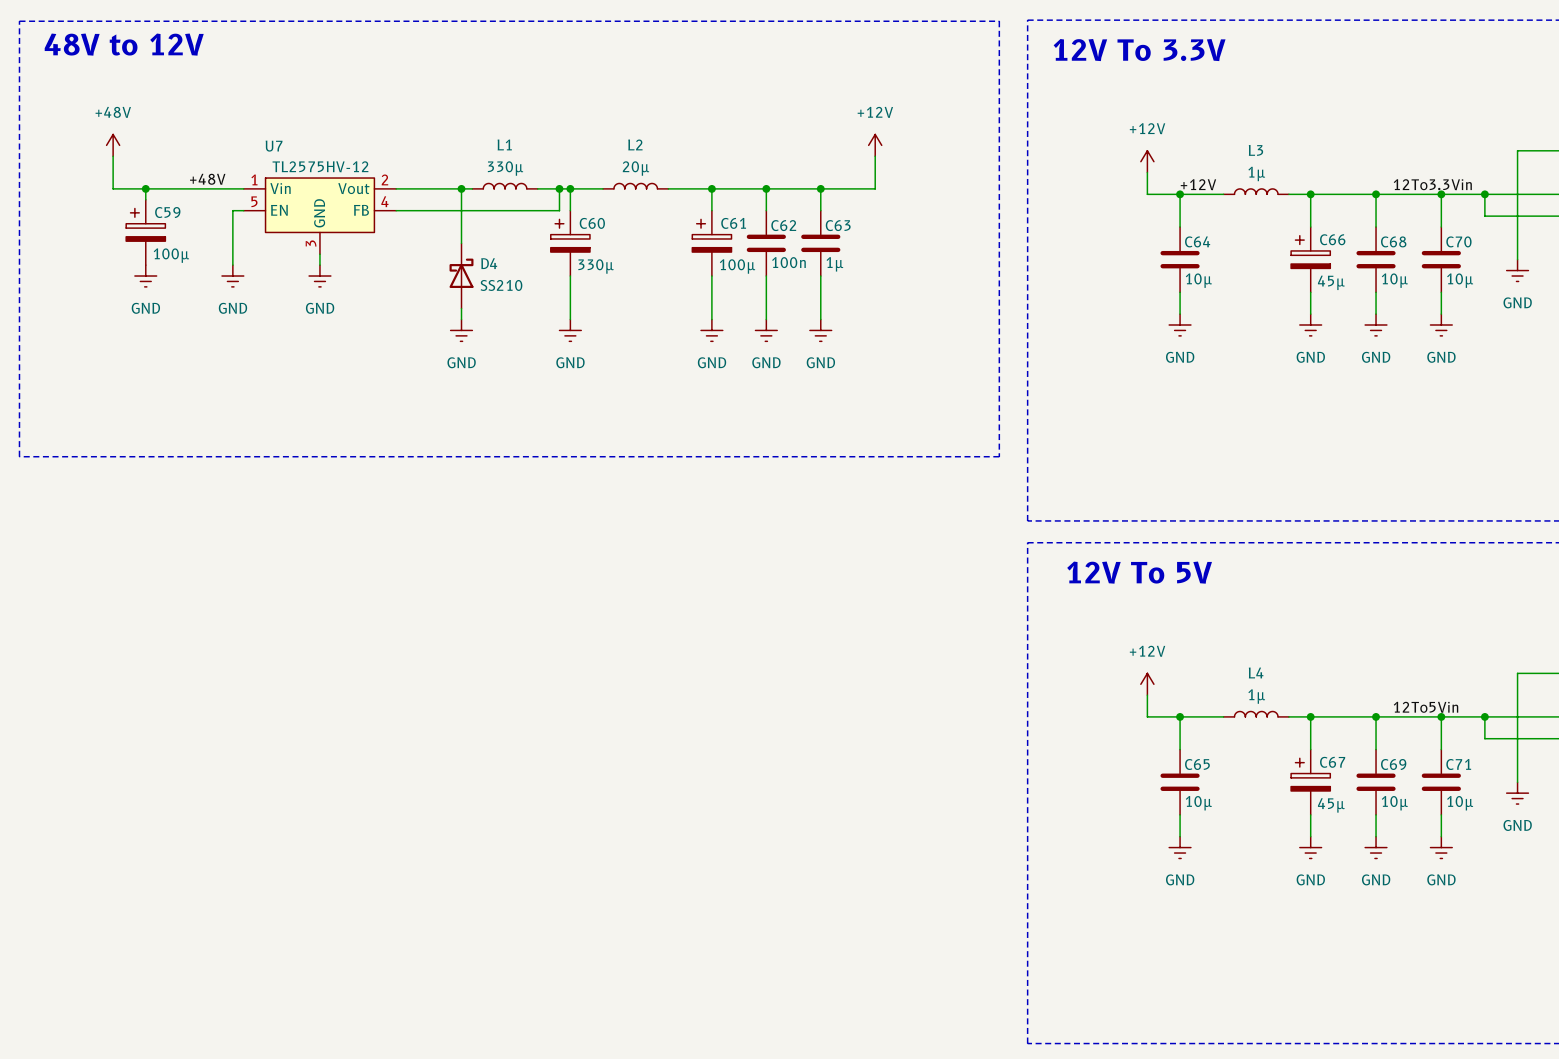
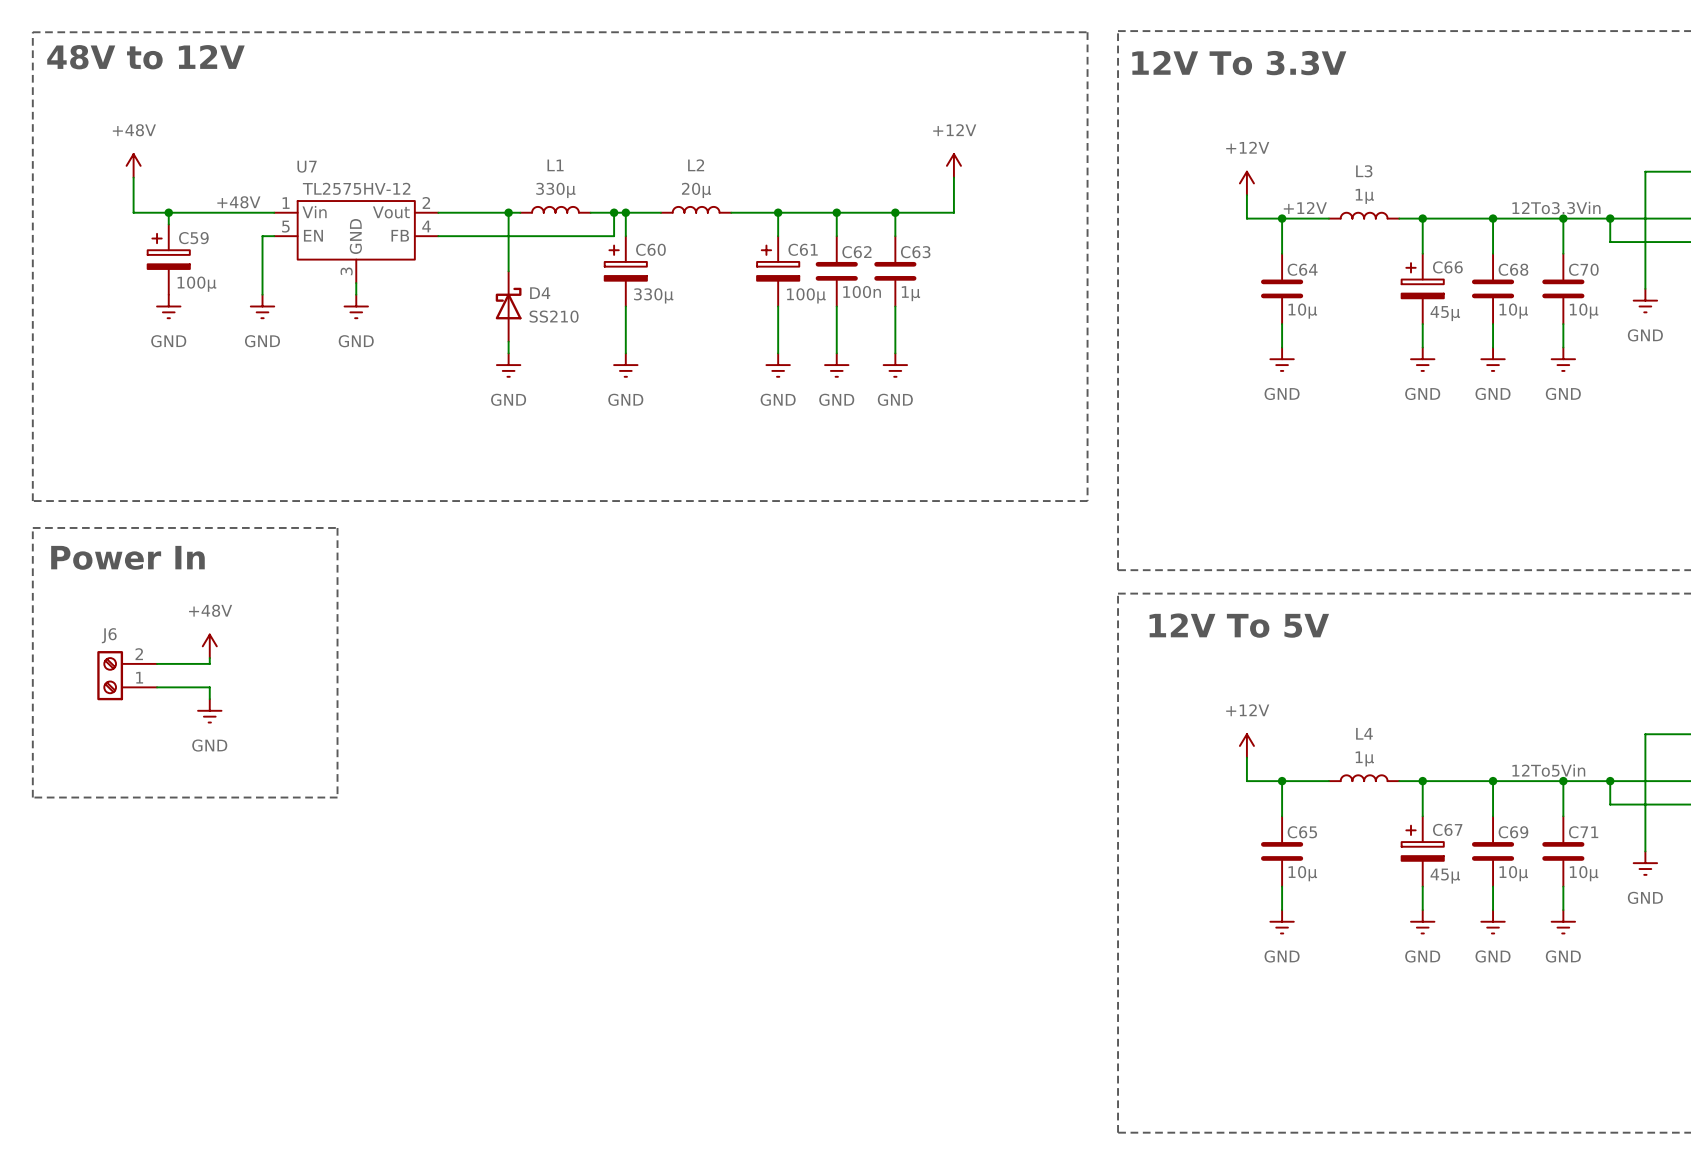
line: none -> (32, 527) (337, 527) (337, 797) (32, 797) (32, 527)
text: none -> Power In (127, 557)
power symbol: none -> +48V (209, 646)
wire: none -> (209, 658) (209, 663) (157, 663)
J6: none -> (127, 675)
wire: none -> (157, 687) (209, 687) (209, 699)
power symbol: none -> GND (209, 710)

